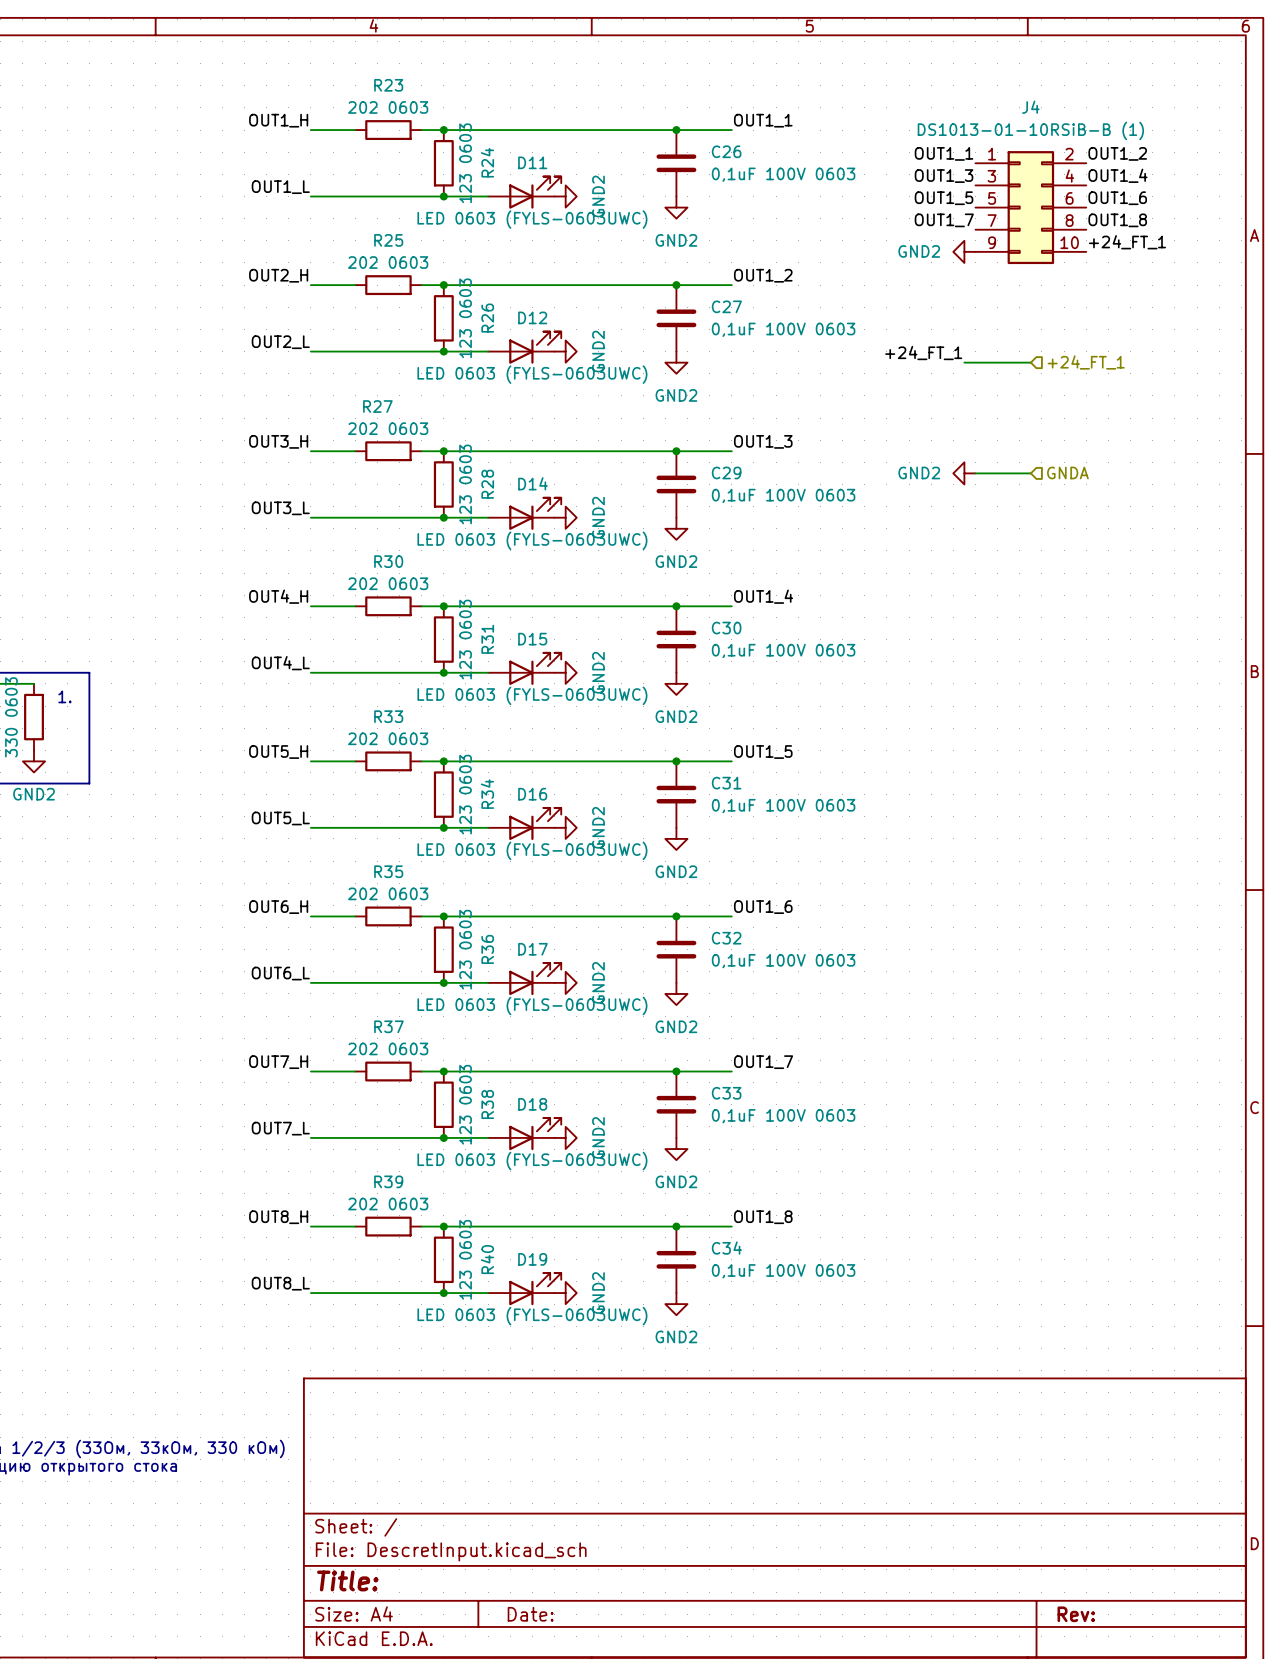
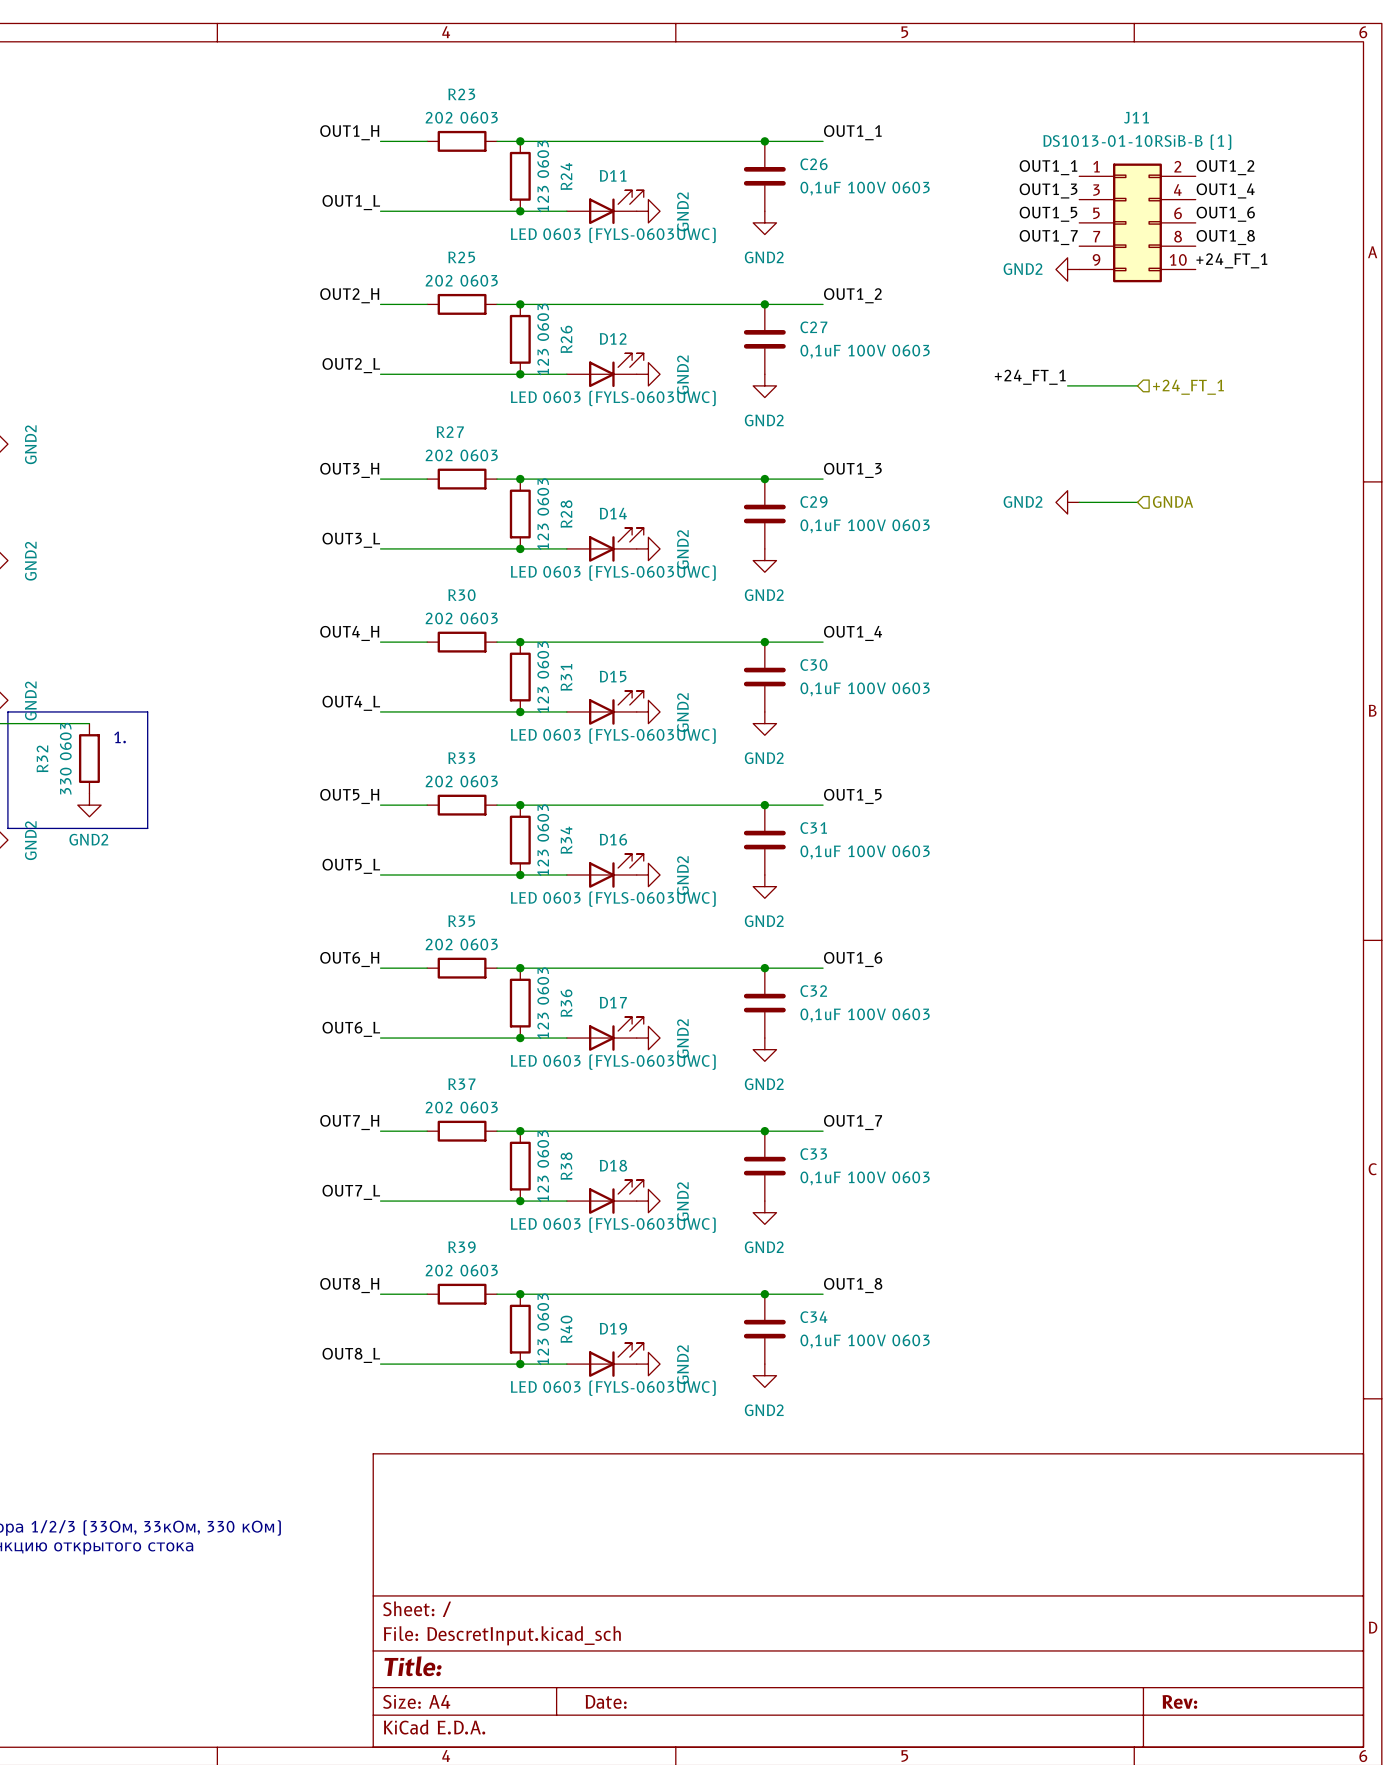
J4 name: J4 (1030, 107) -> J11 (1136, 117)

